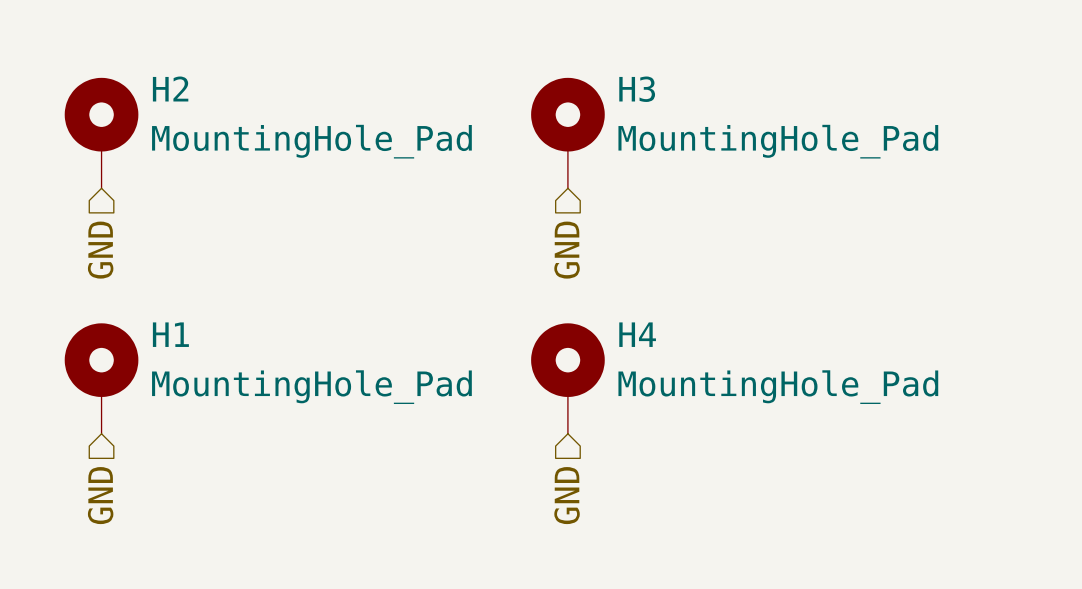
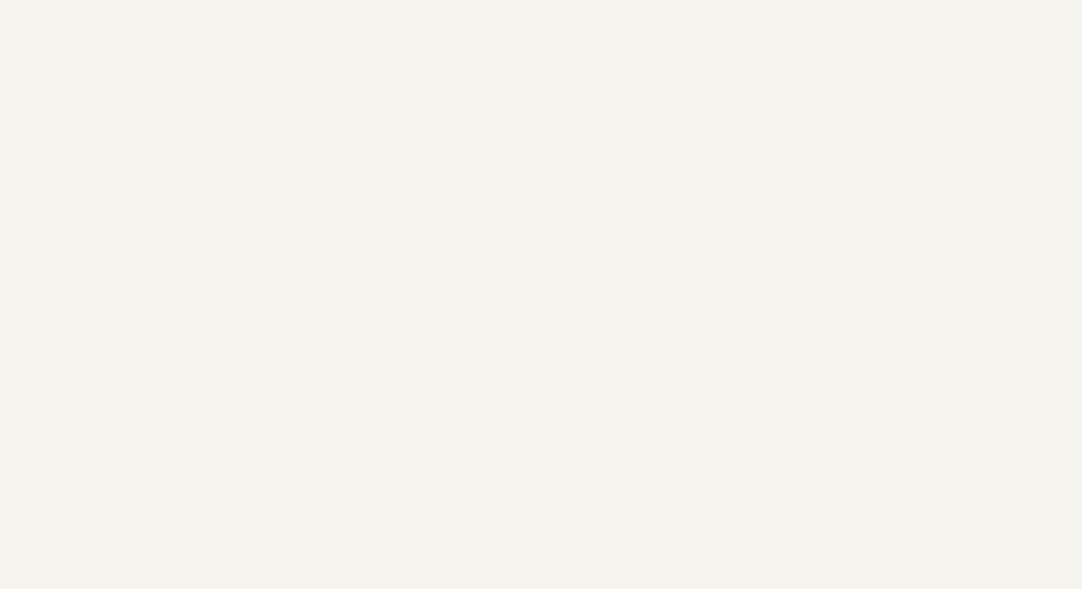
H2: MountingHole_Pad (101, 133) -> none
H3: MountingHole_Pad (567, 133) -> none
hierarchical label: GND (100, 250) -> none
hierarchical label: GND (567, 250) -> none
H1: MountingHole_Pad (101, 378) -> none
H4: MountingHole_Pad (567, 378) -> none
hierarchical label: GND (100, 495) -> none
hierarchical label: GND (567, 495) -> none

